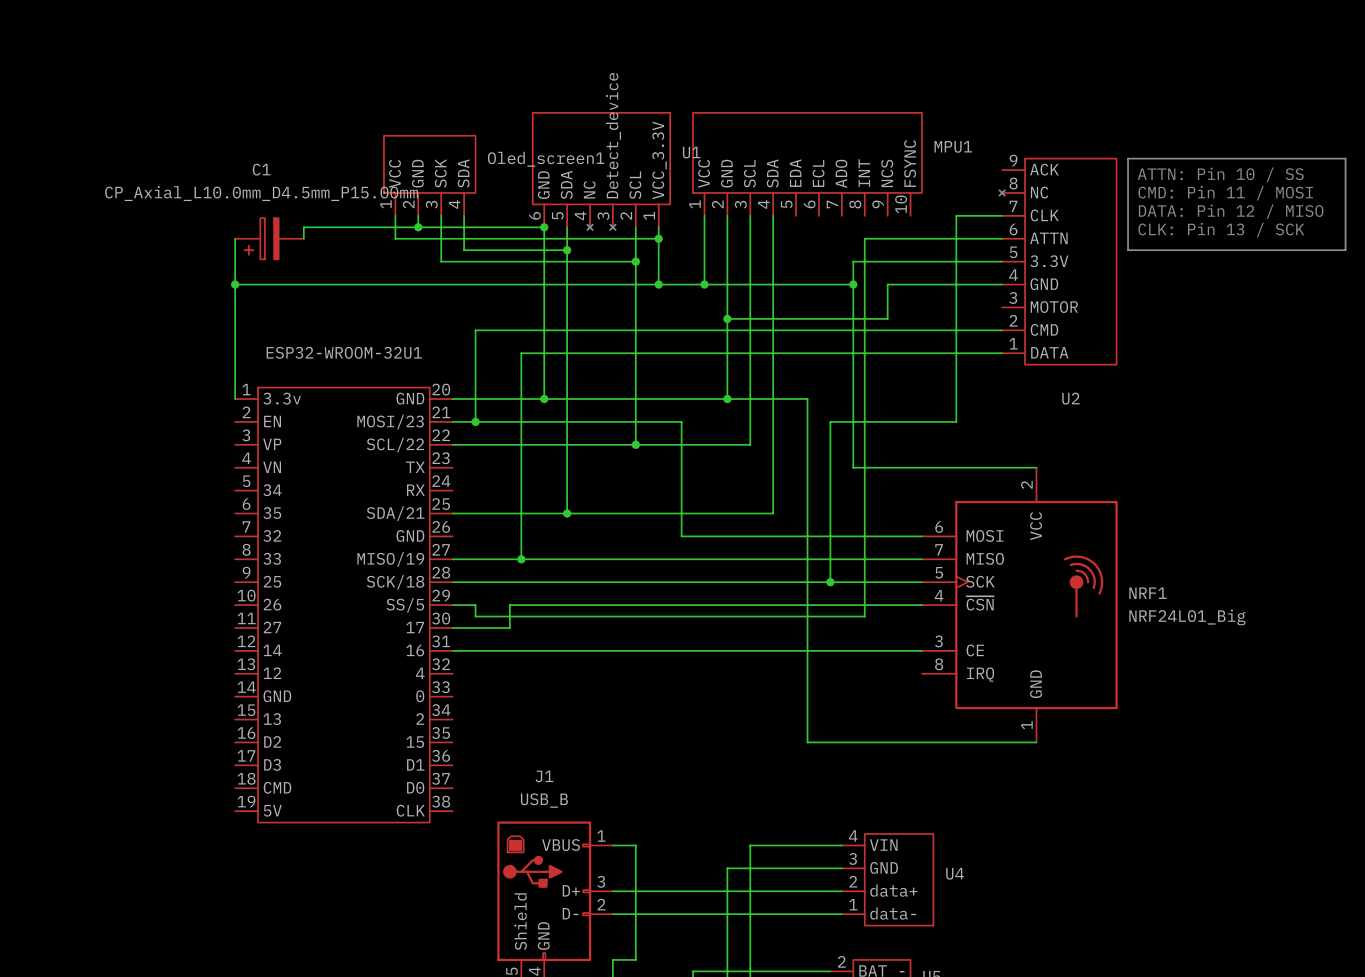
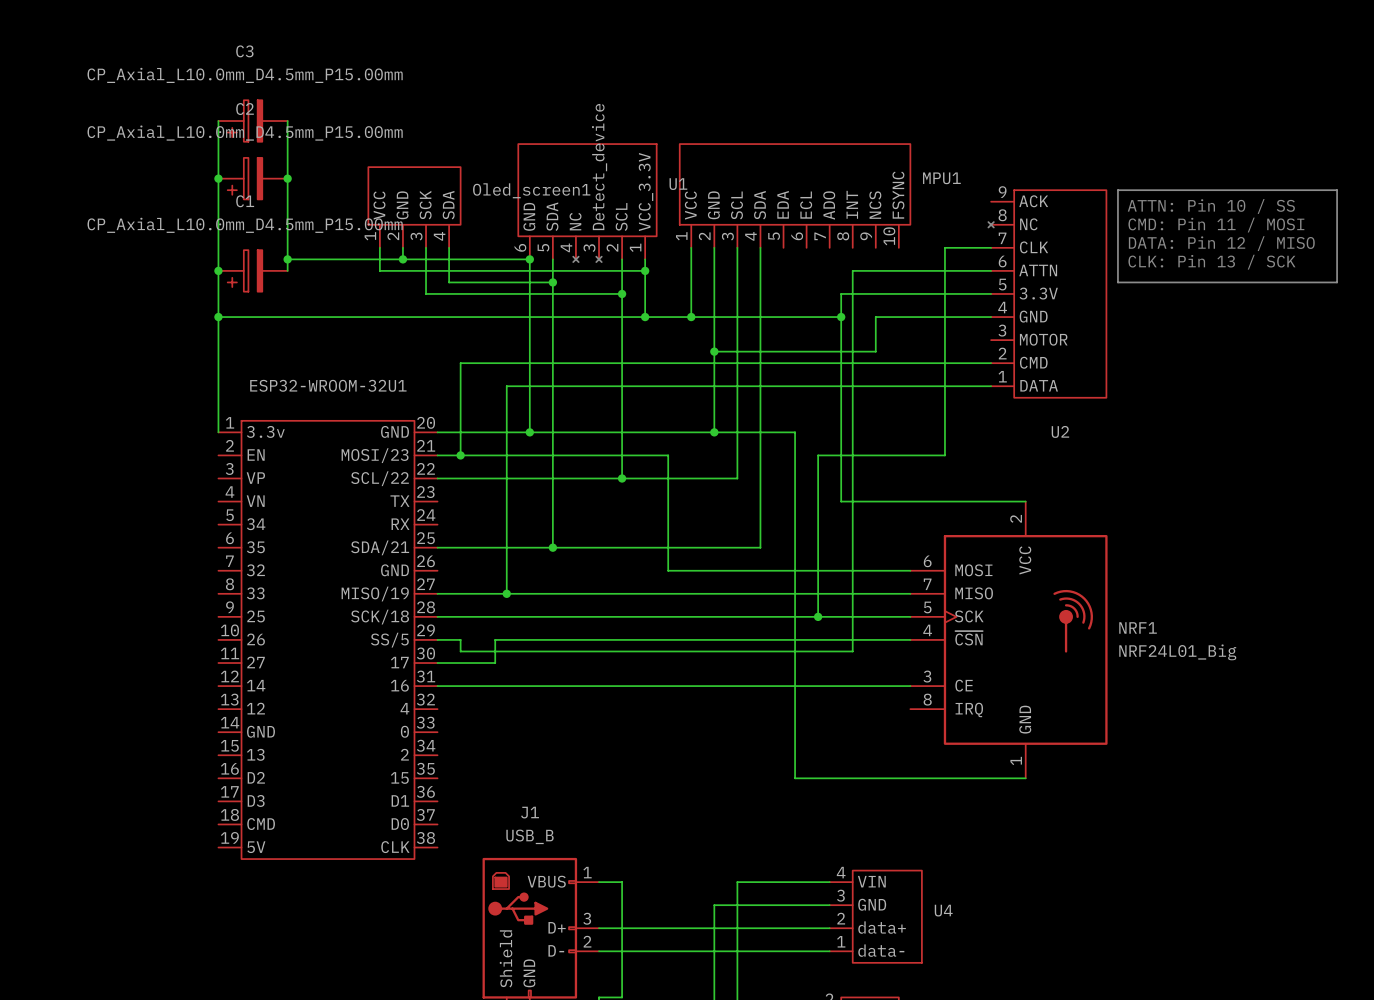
wire: none -> (218, 120) (218, 270)
C3: none -> CP_Axial_L10.0mm_D4.5mm_P15.00mm (253, 120)
wire: none -> (287, 120) (287, 259)
junction: none -> (218, 178)
C2: none -> CP_Axial_L10.0mm_D4.5mm_P15.00mm (253, 178)
junction: none -> (287, 178)
junction: none -> (287, 259)
junction: none -> (218, 270)

